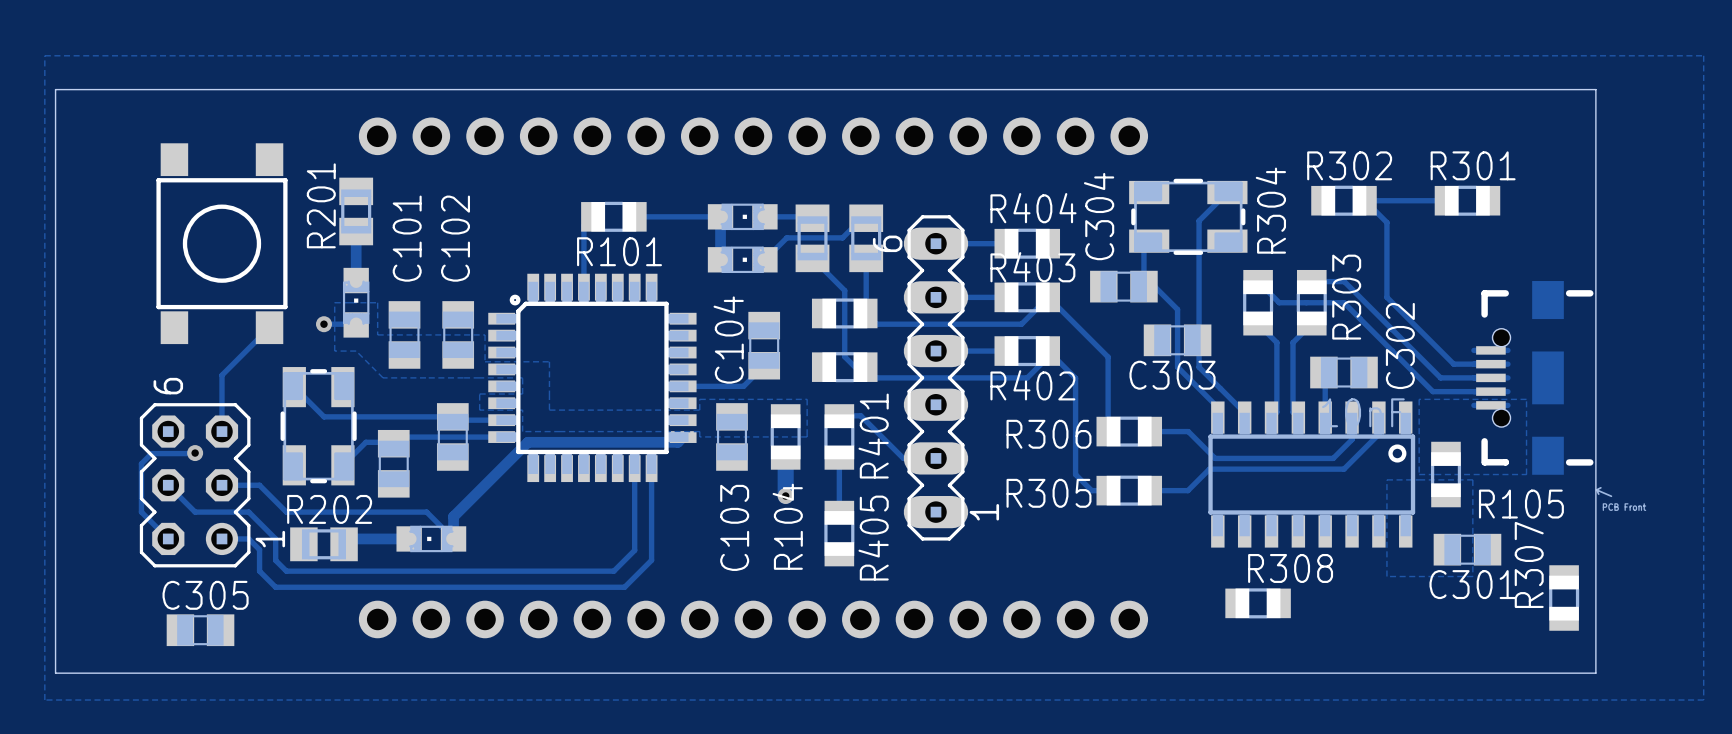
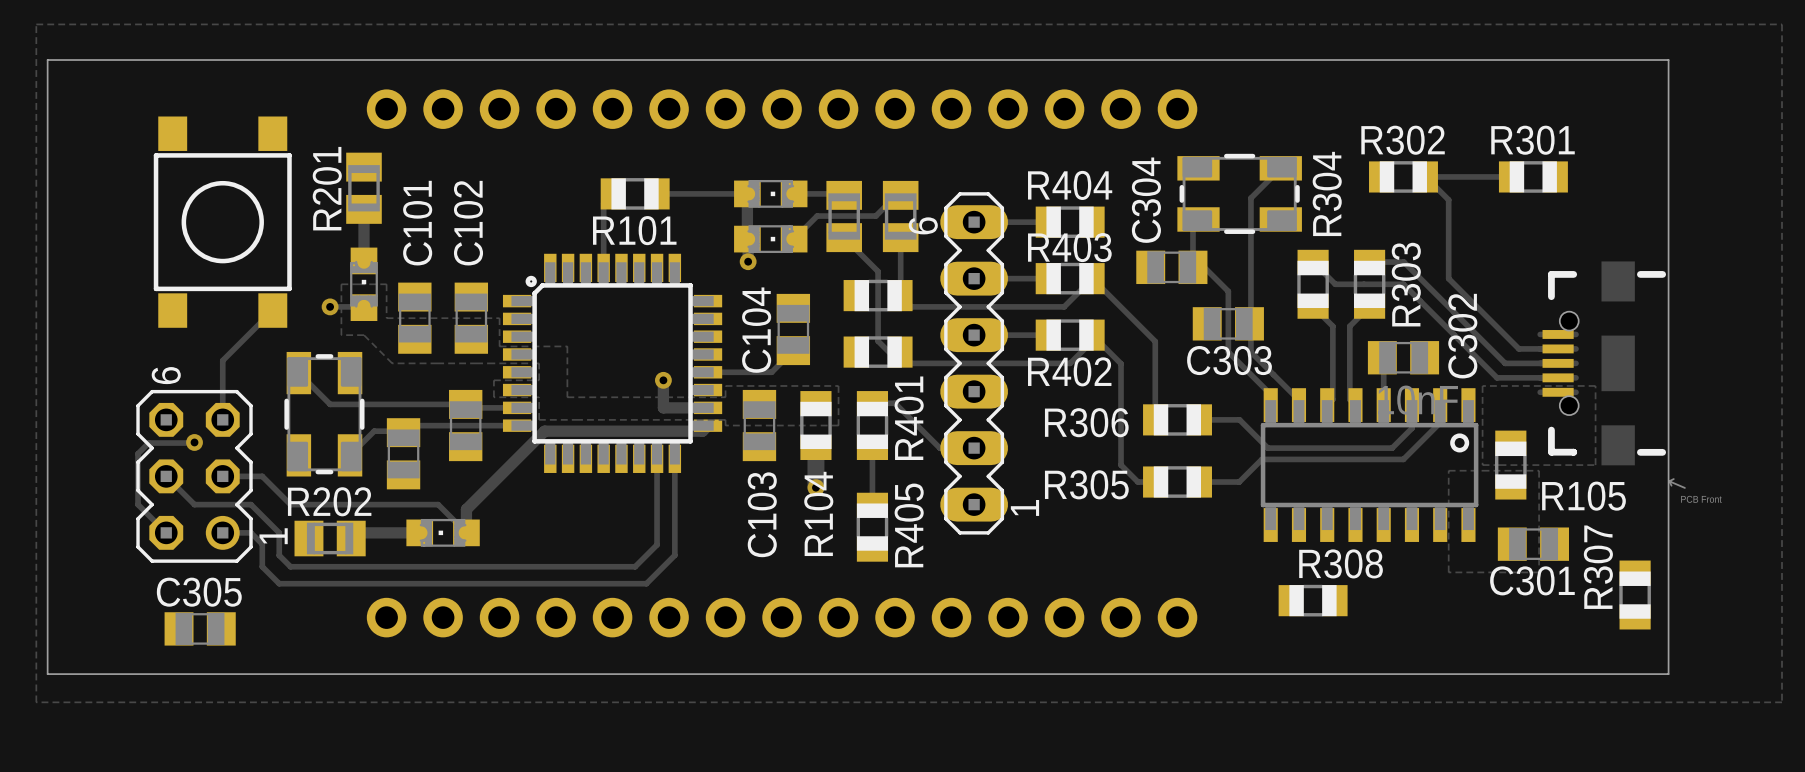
via: none -> (748, 261)
track: none -> (663, 380) (663, 407) (708, 407)
via: none -> (663, 380)

